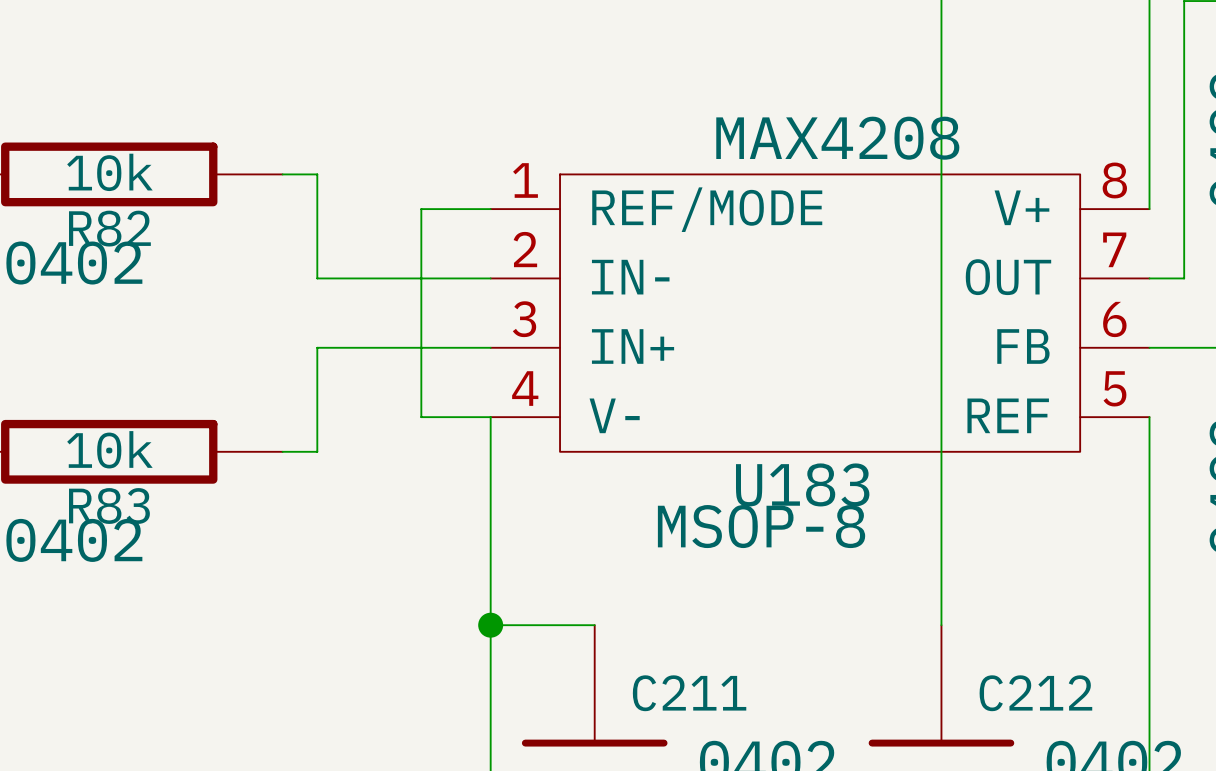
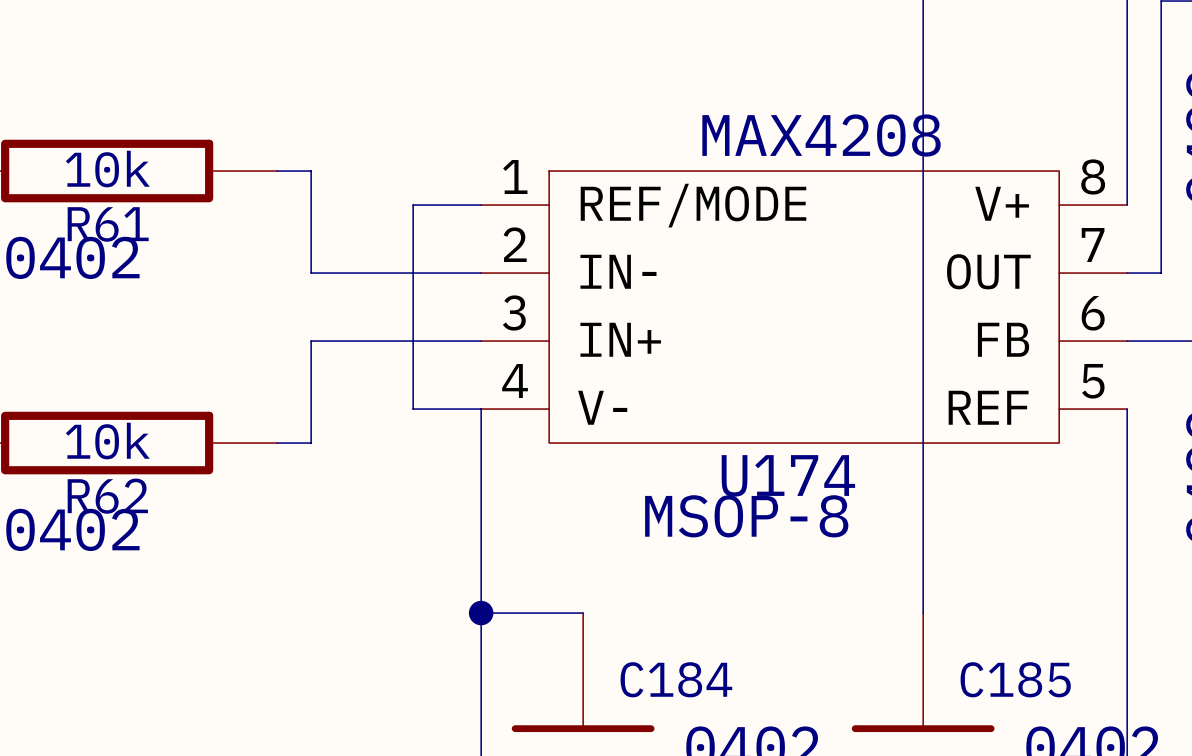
R82 name: R82 (109, 228) -> R61 (108, 224)
U183 name: U183 (802, 484) -> U174 (788, 475)
R83 name: R83 (109, 506) -> R62 (107, 496)
C211 name: C211 (689, 693) -> C184 (676, 679)
C212 name: C212 (1035, 693) -> C185 (1015, 679)

